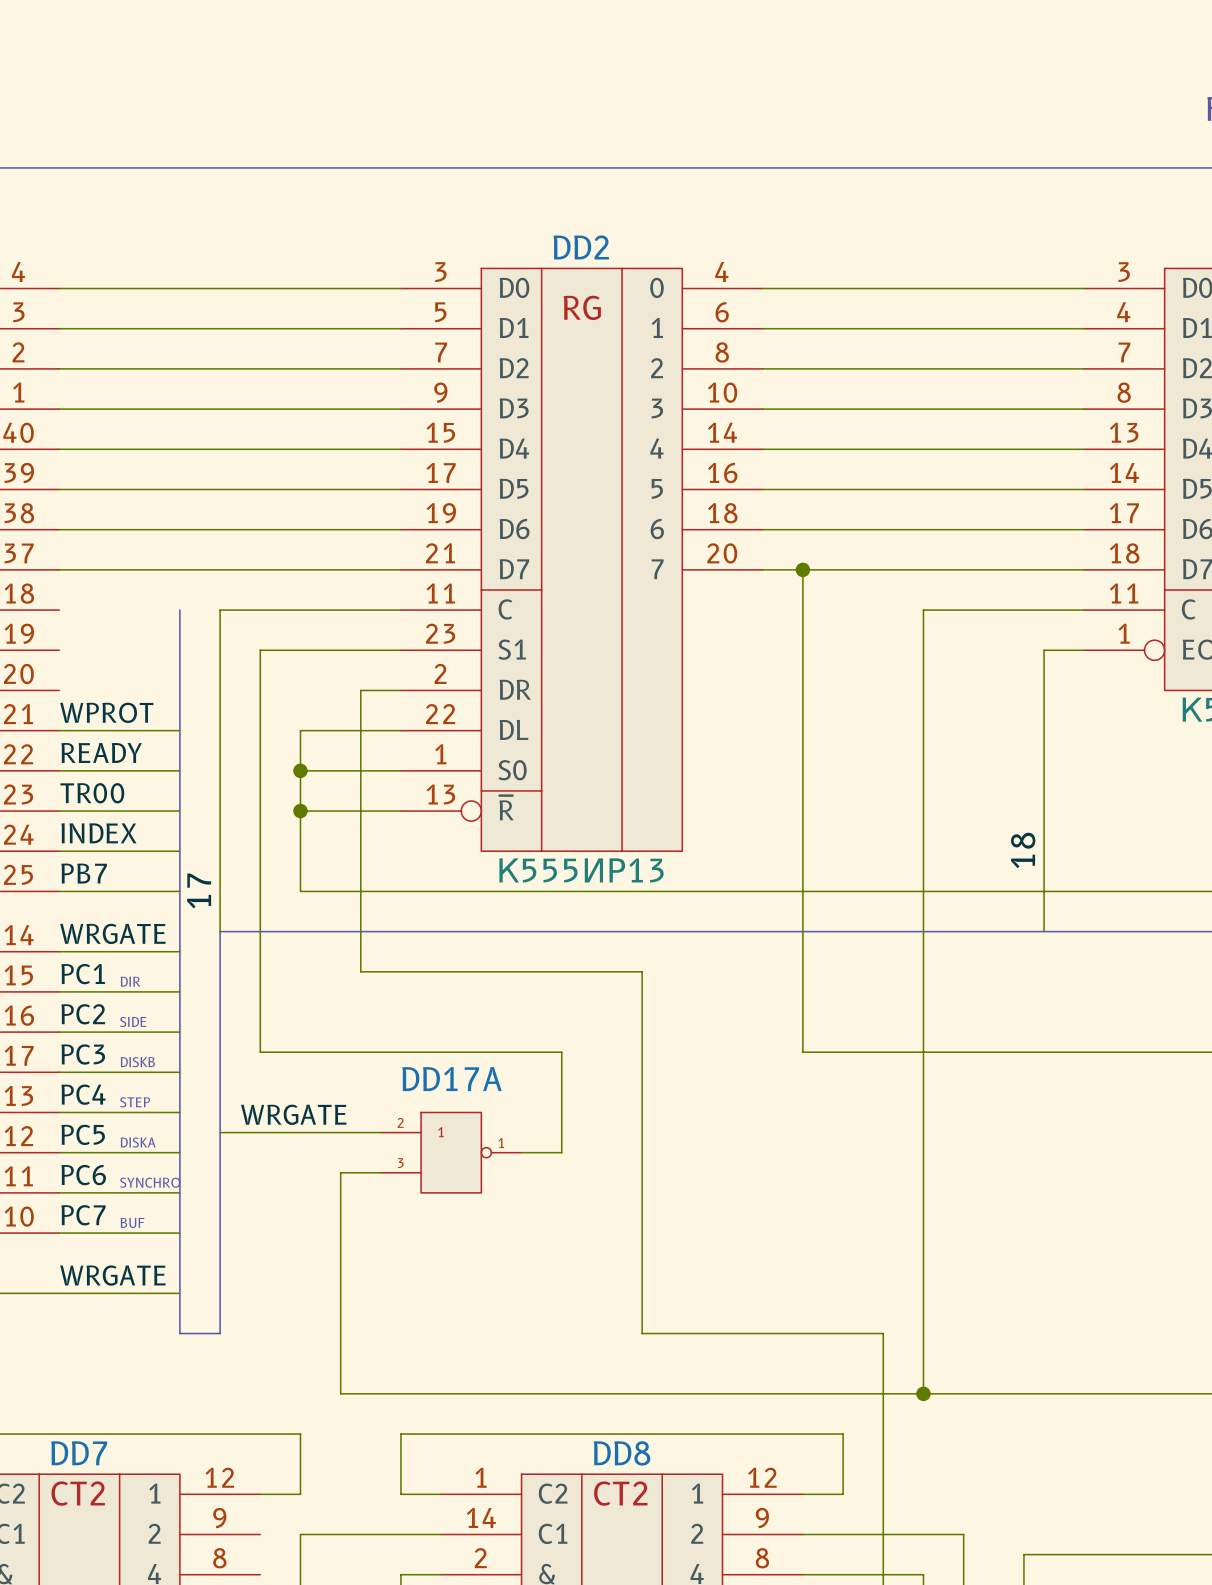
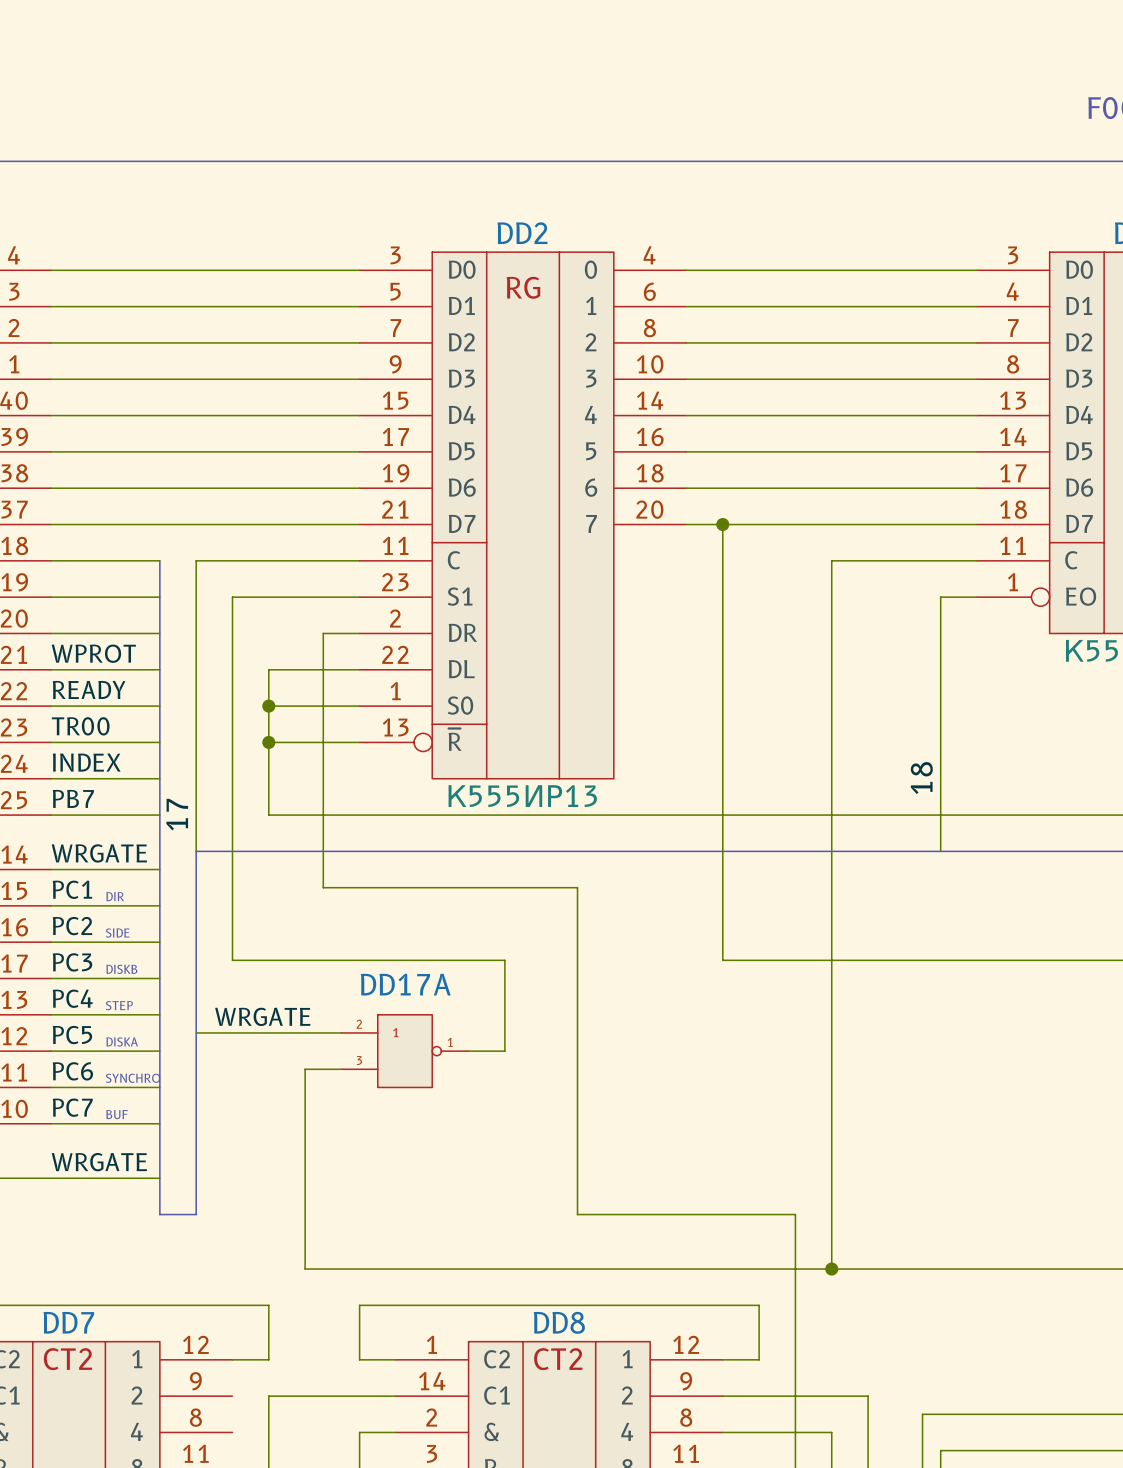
wire: none -> (50, 560) (159, 560)
wire: none -> (50, 597) (159, 597)
wire: none -> (50, 633) (159, 633)

